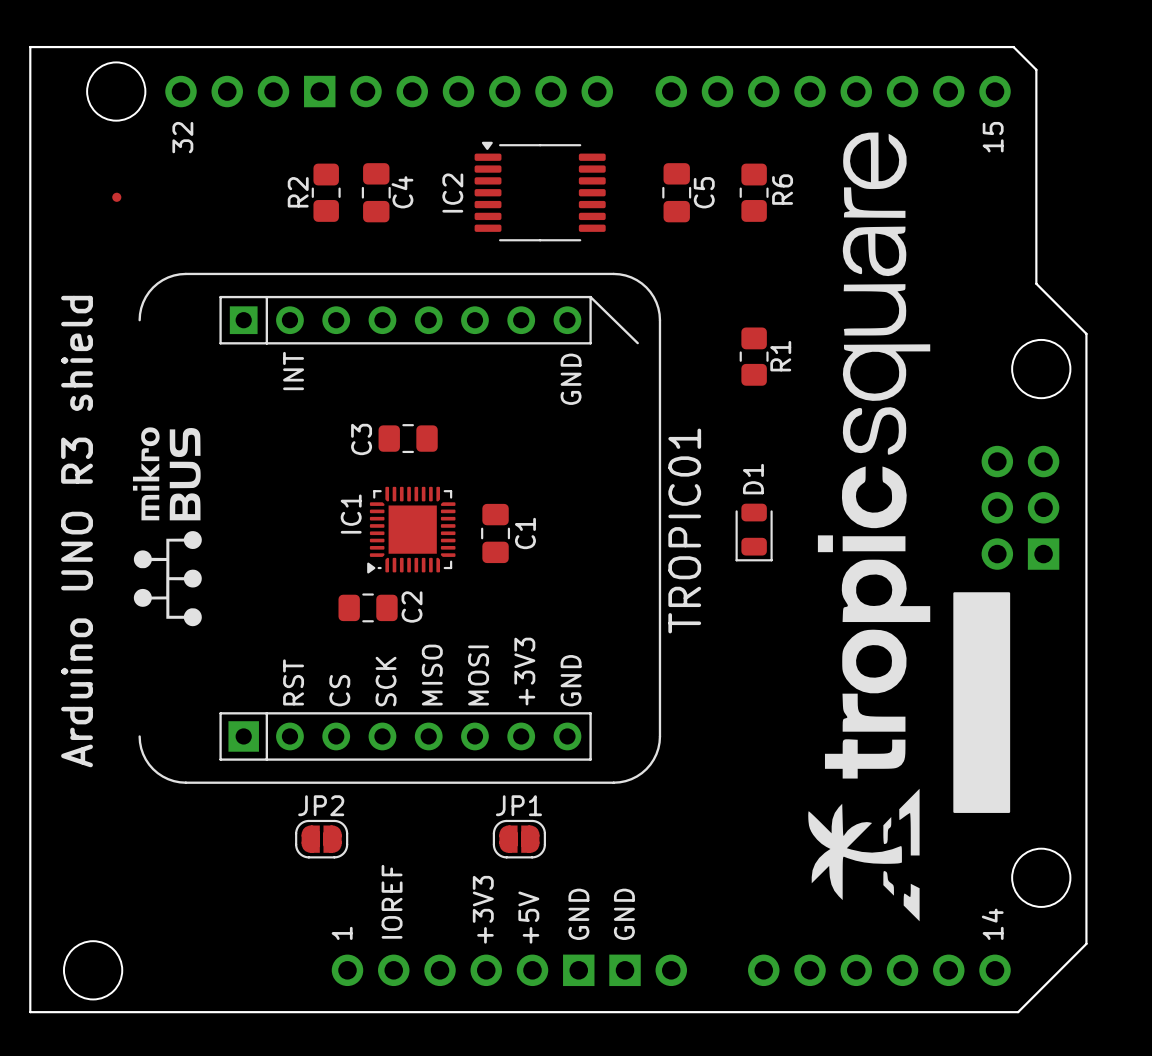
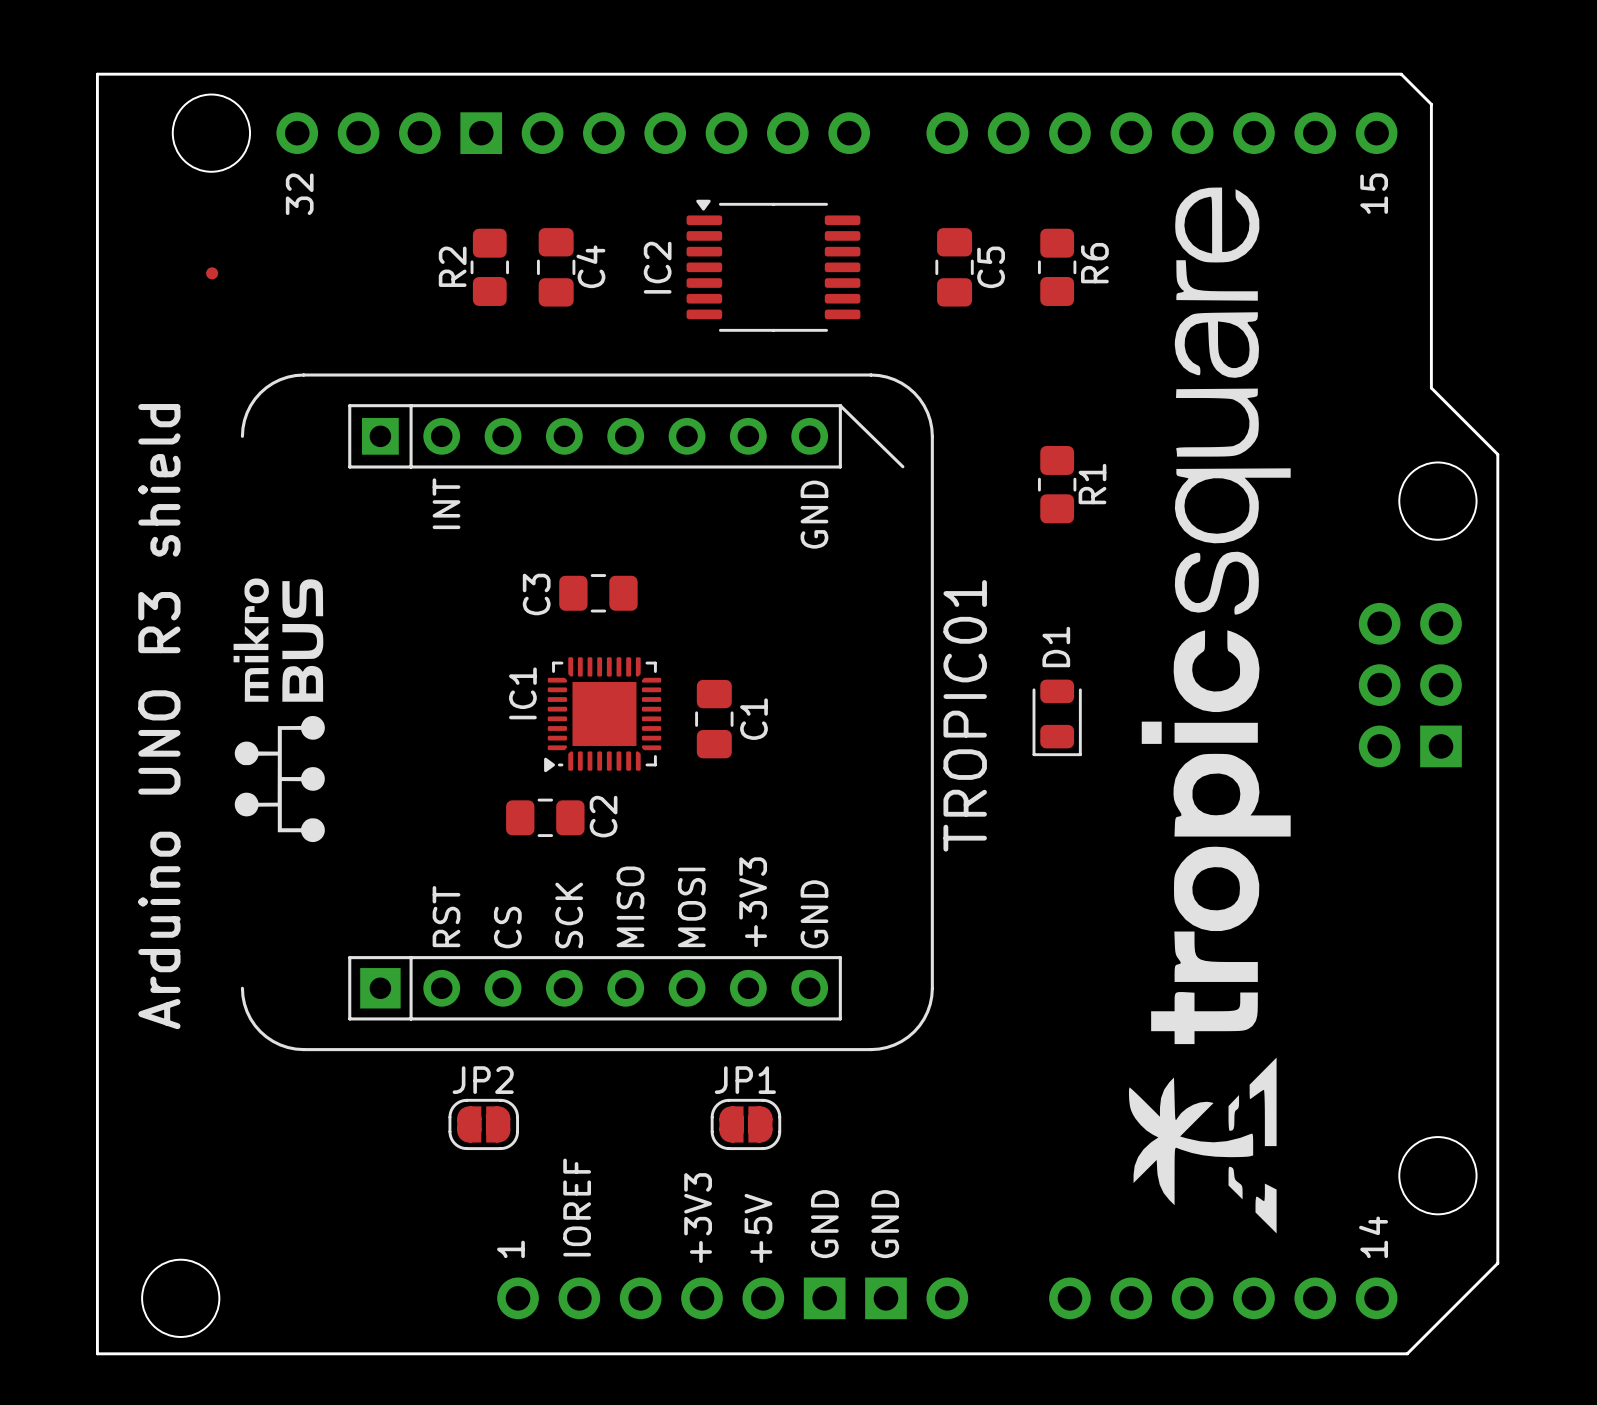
drawing: [953, 592, 1011, 813] -> none

